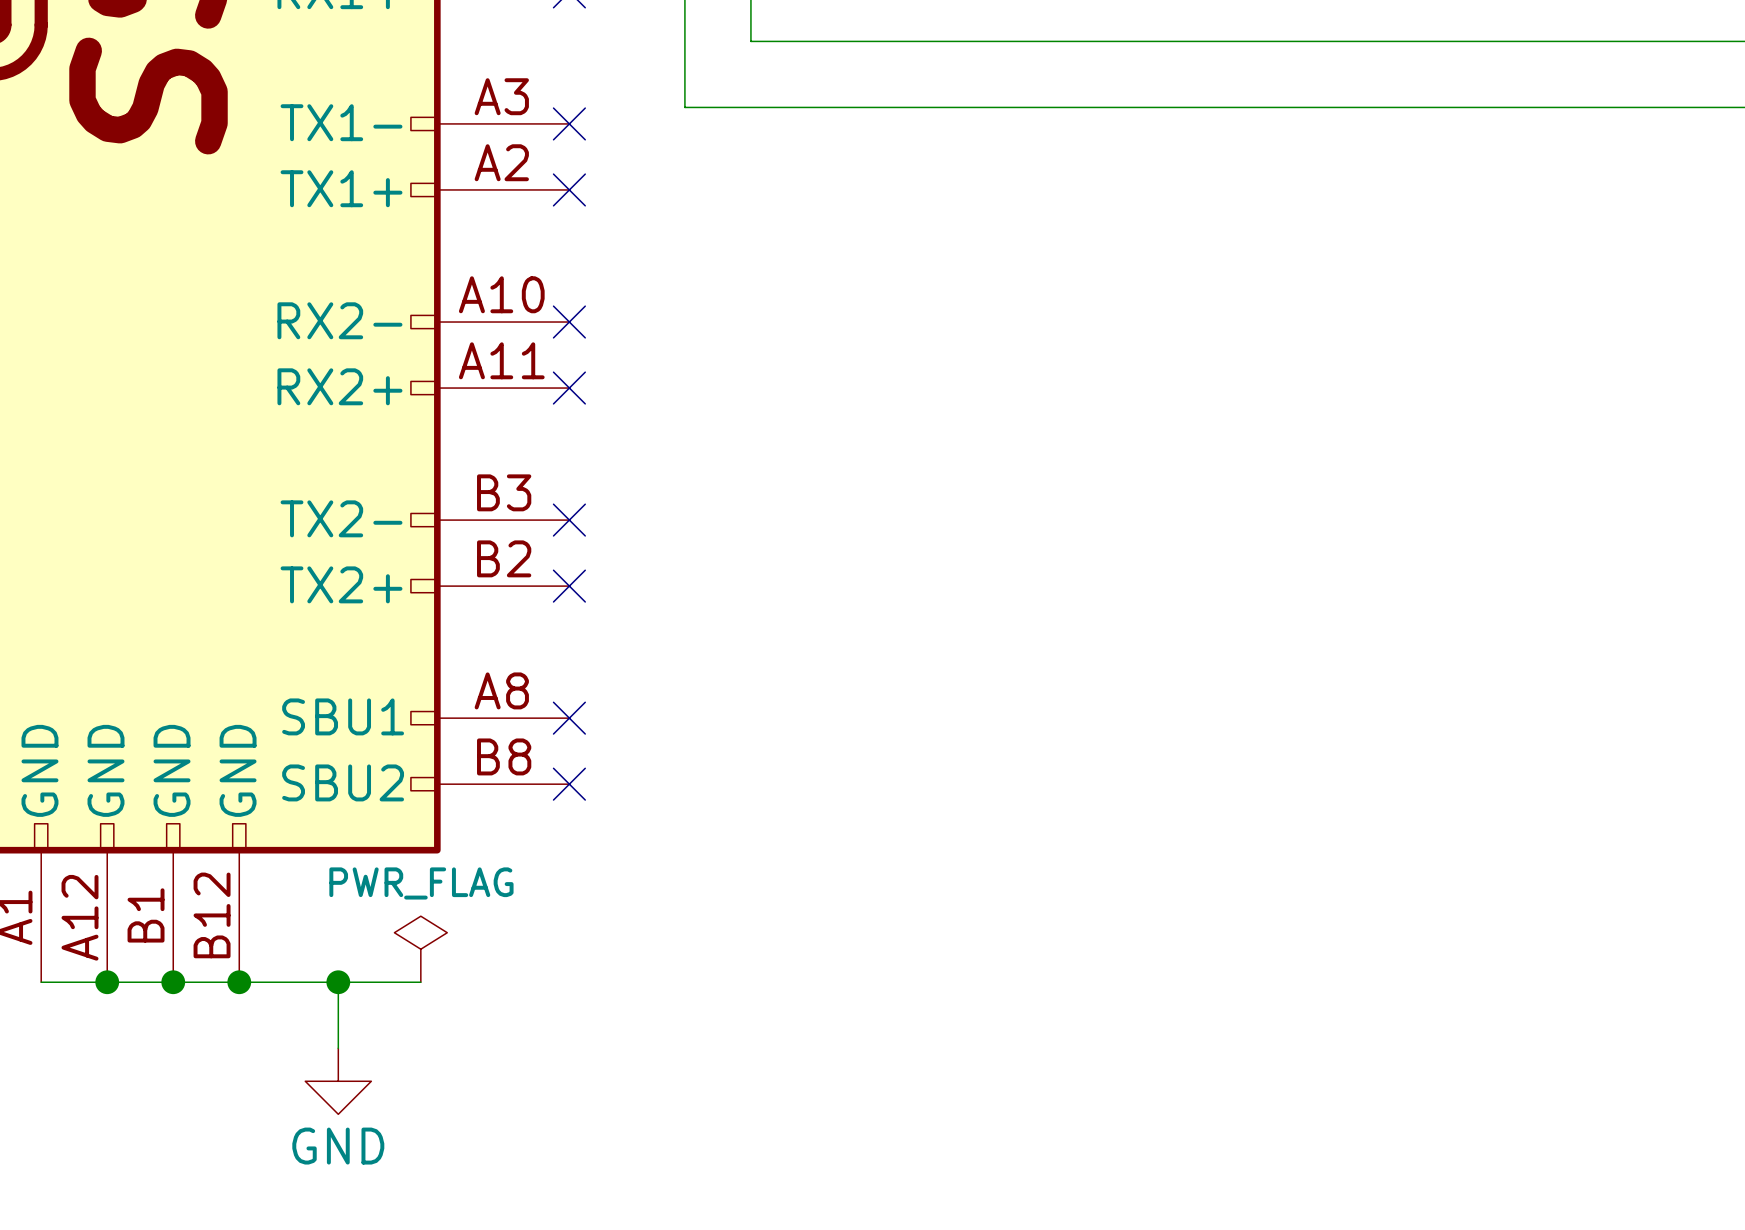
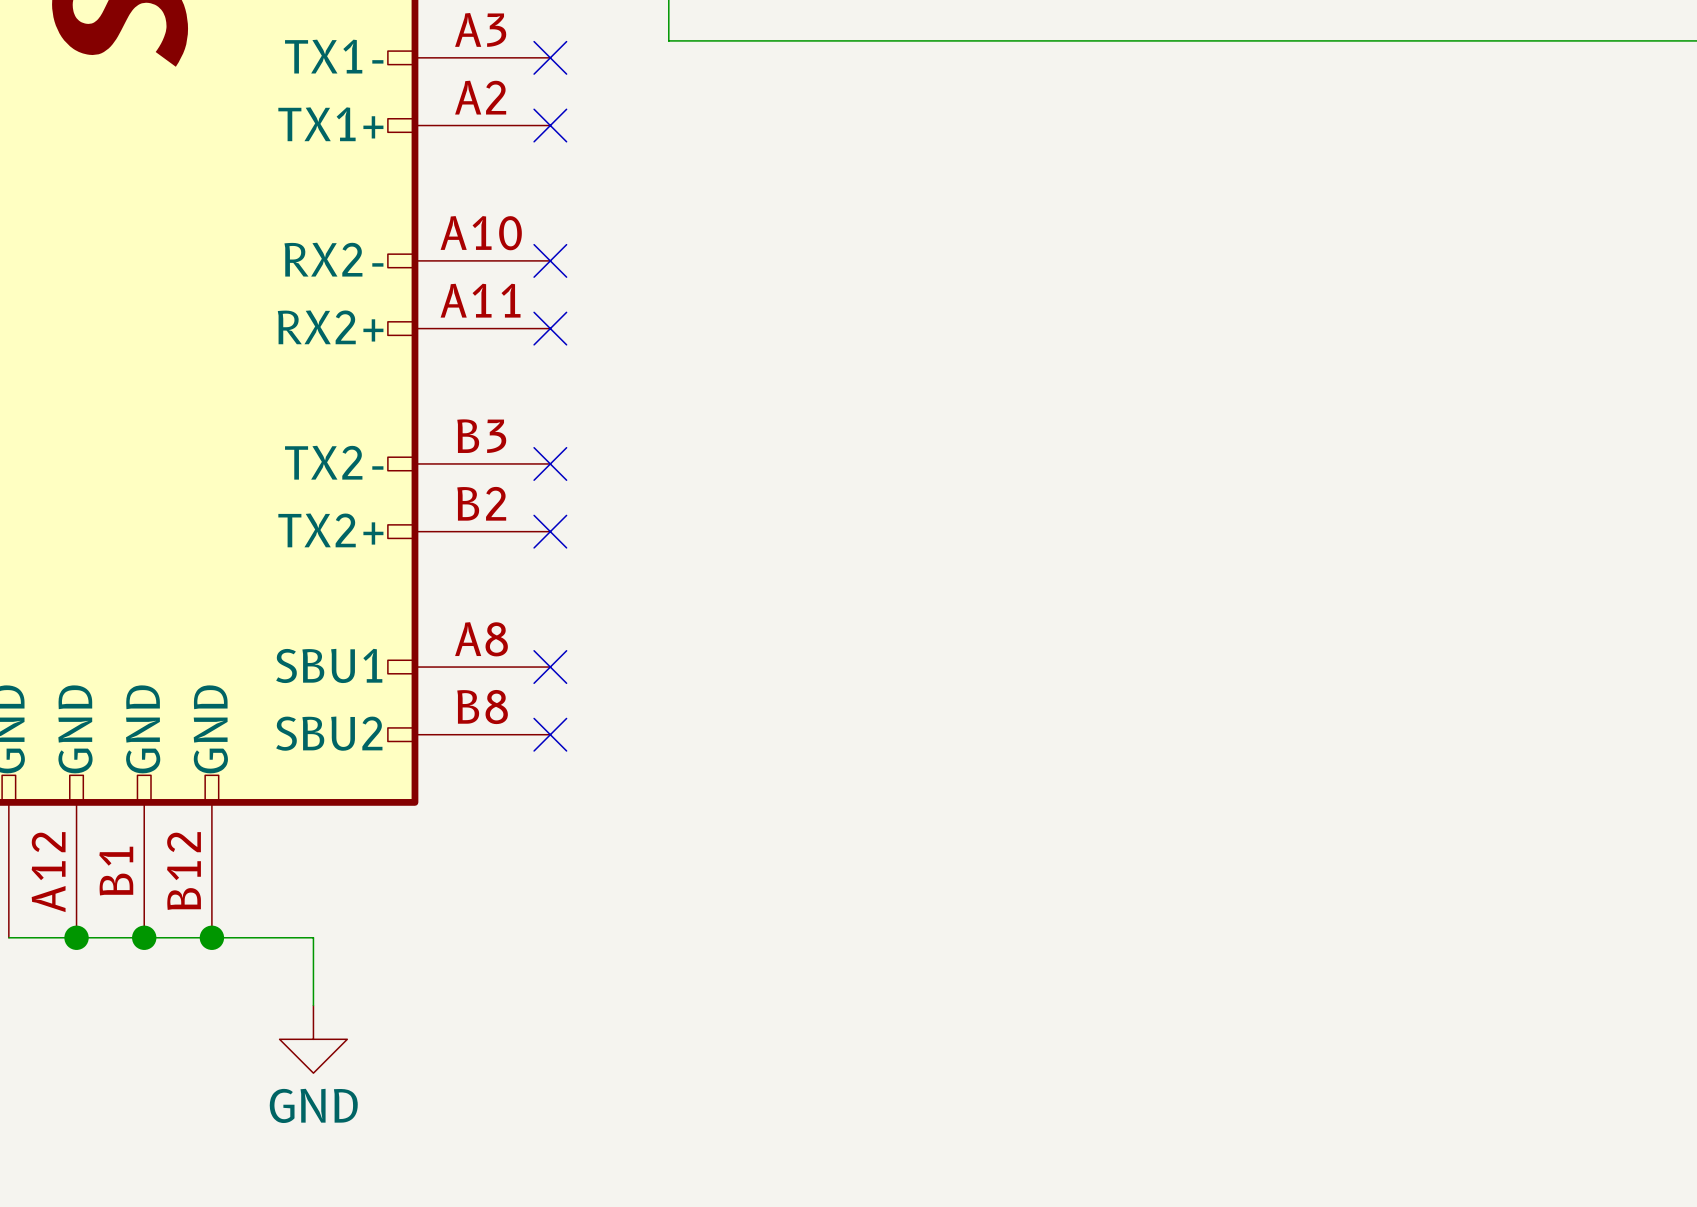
power symbol: PWR_FLAG (420, 949) -> none
wire: (338, 982) (420, 982) -> none
junction: (338, 982) -> none

